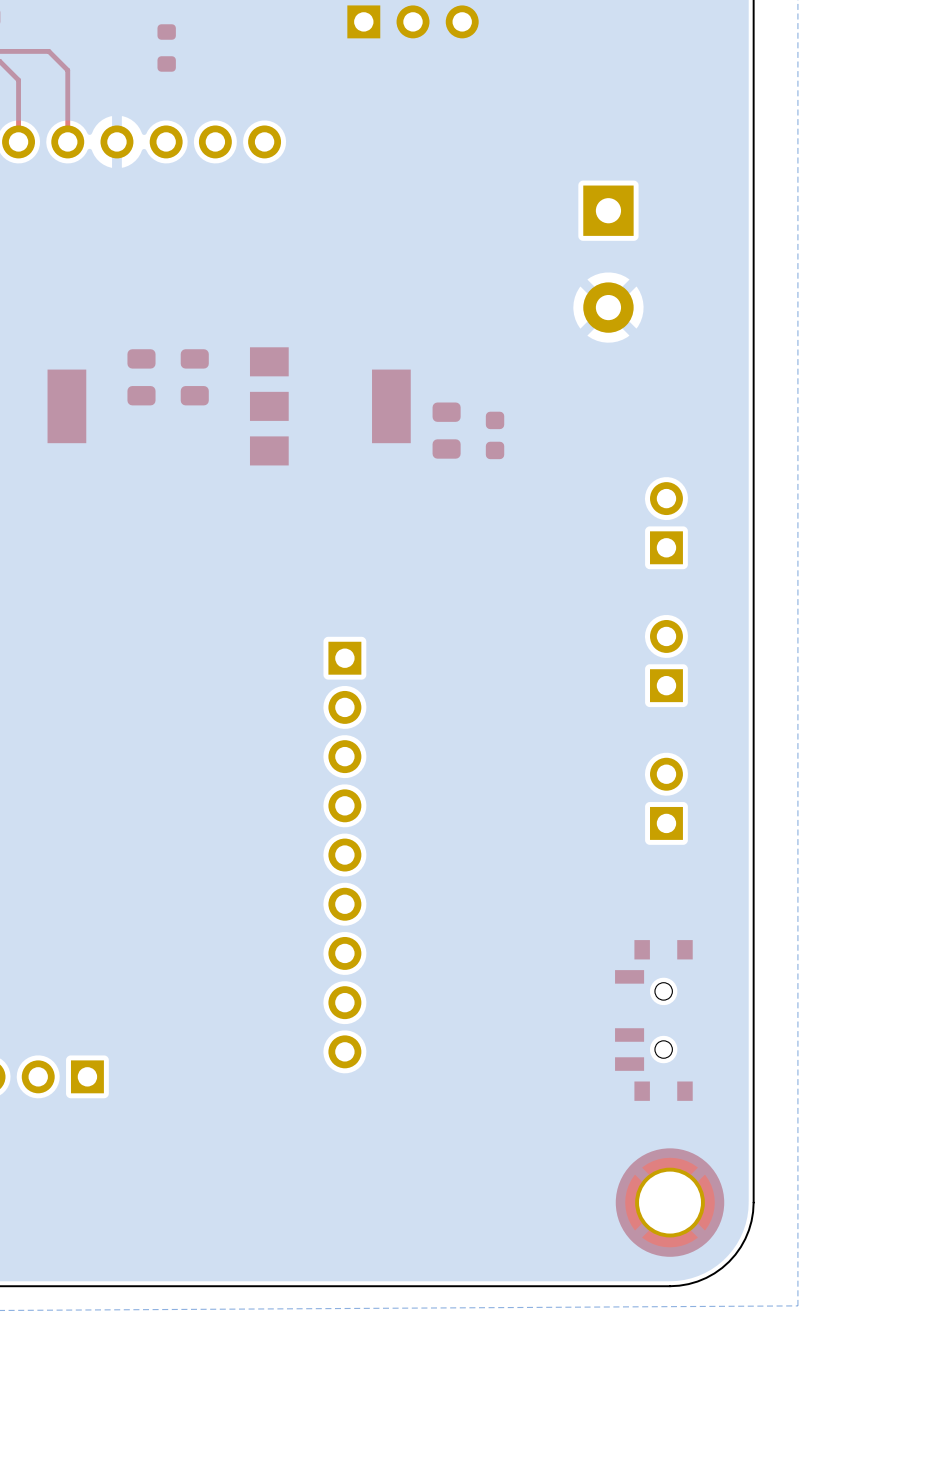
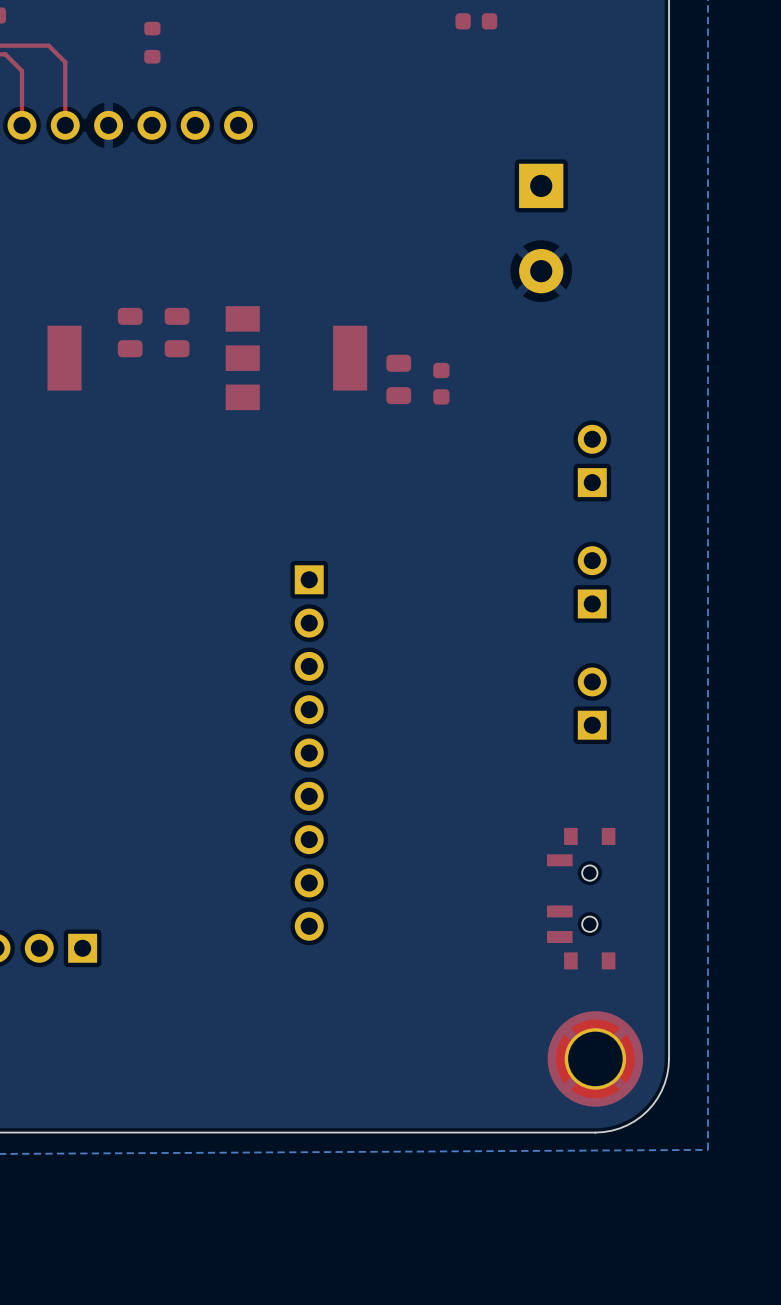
part: (413, 21) -> none
part: none -> (476, 21)

